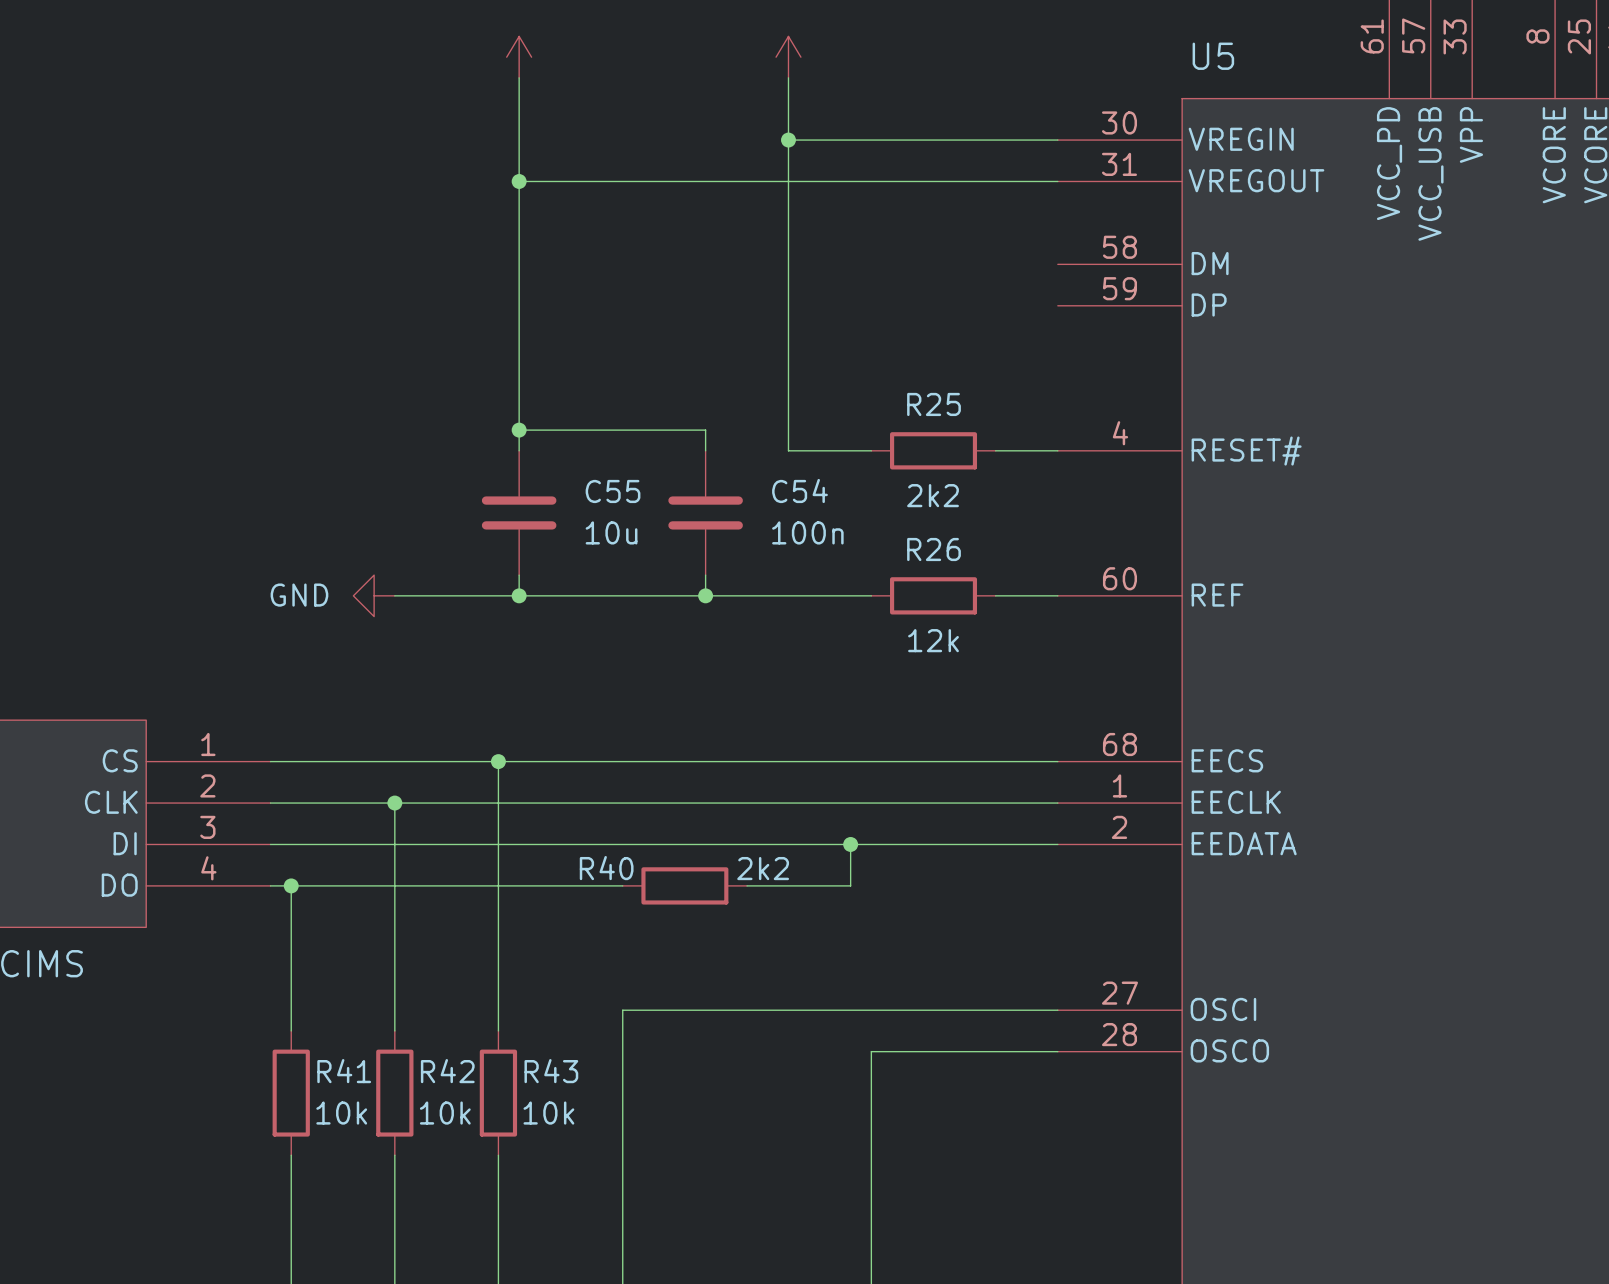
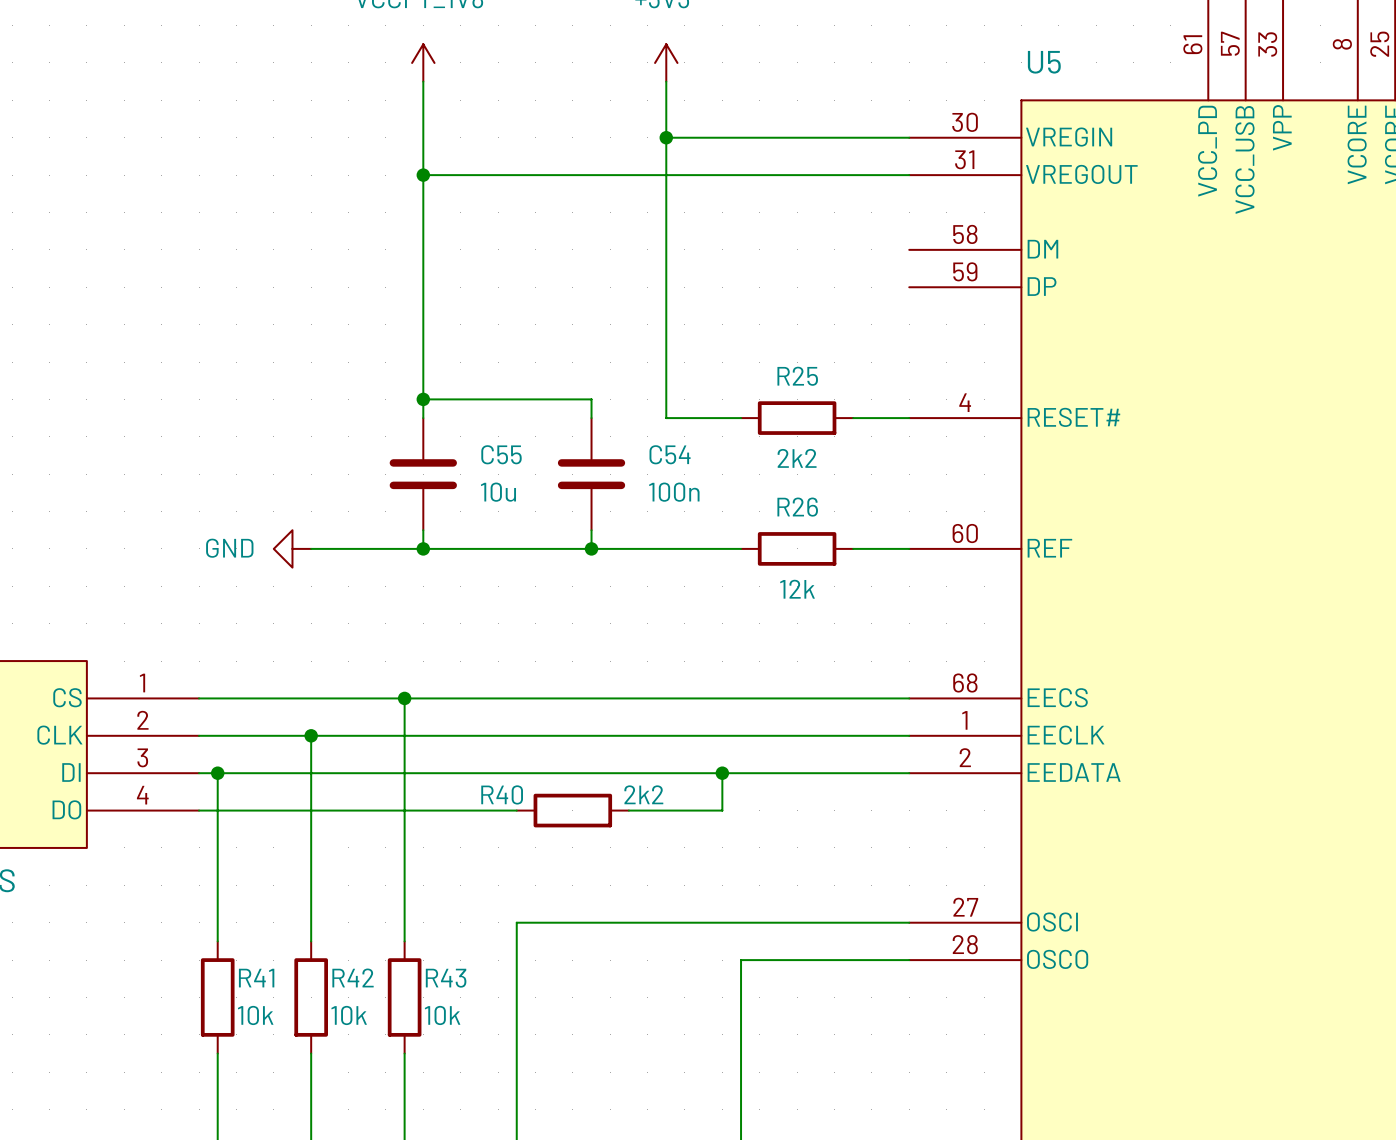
wire: none -> (217, 773) (217, 810)
junction position: (291, 885) -> (217, 773)

